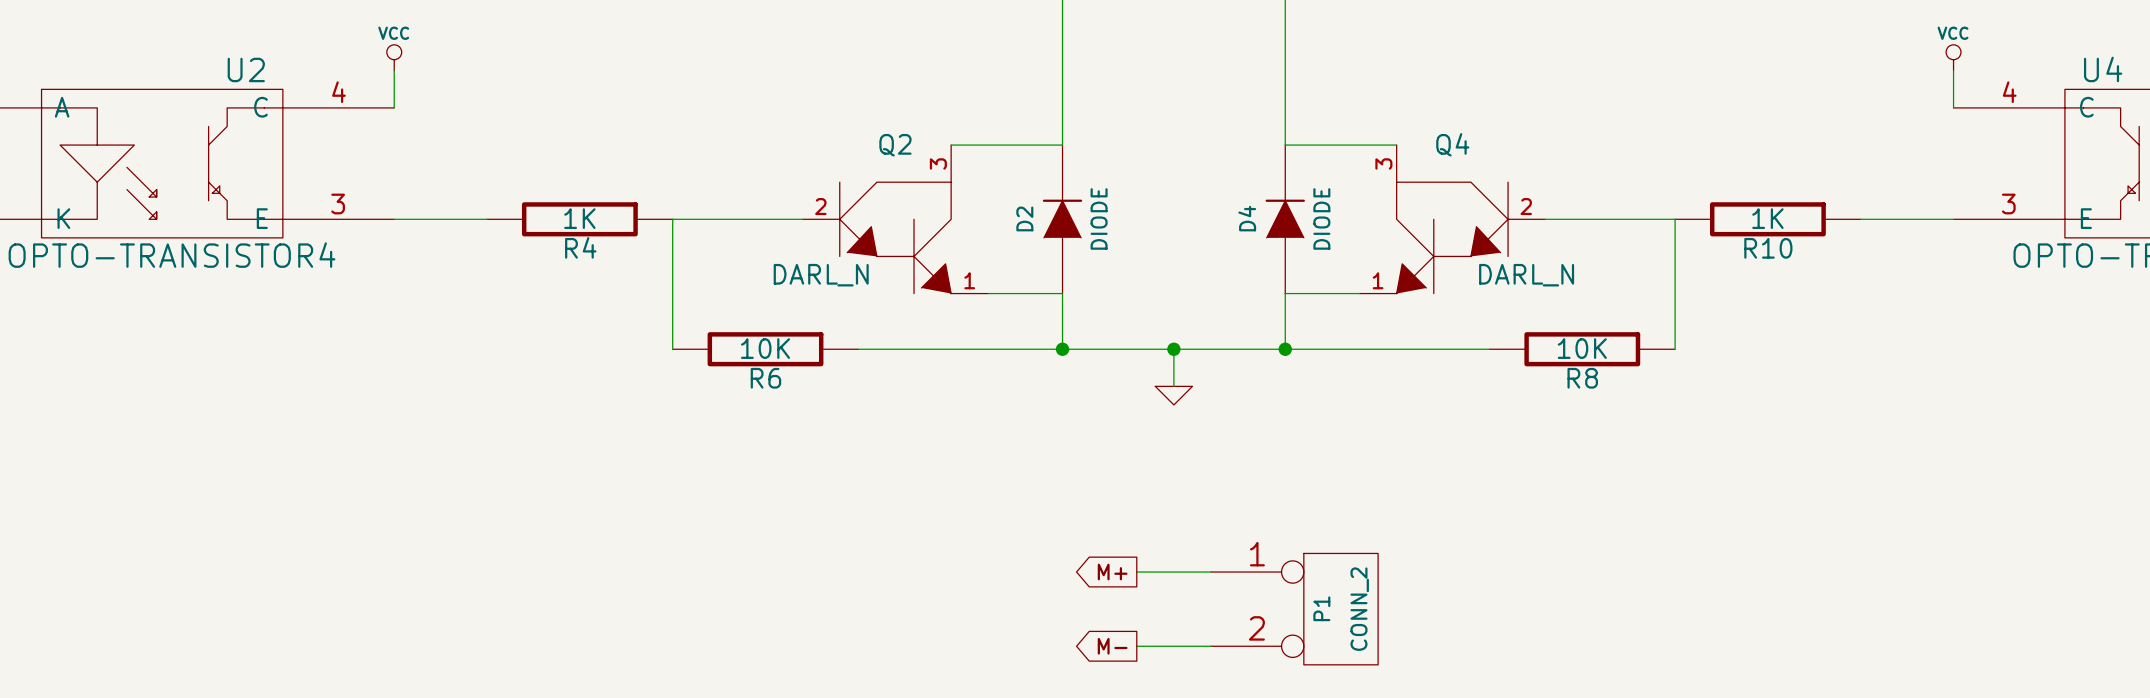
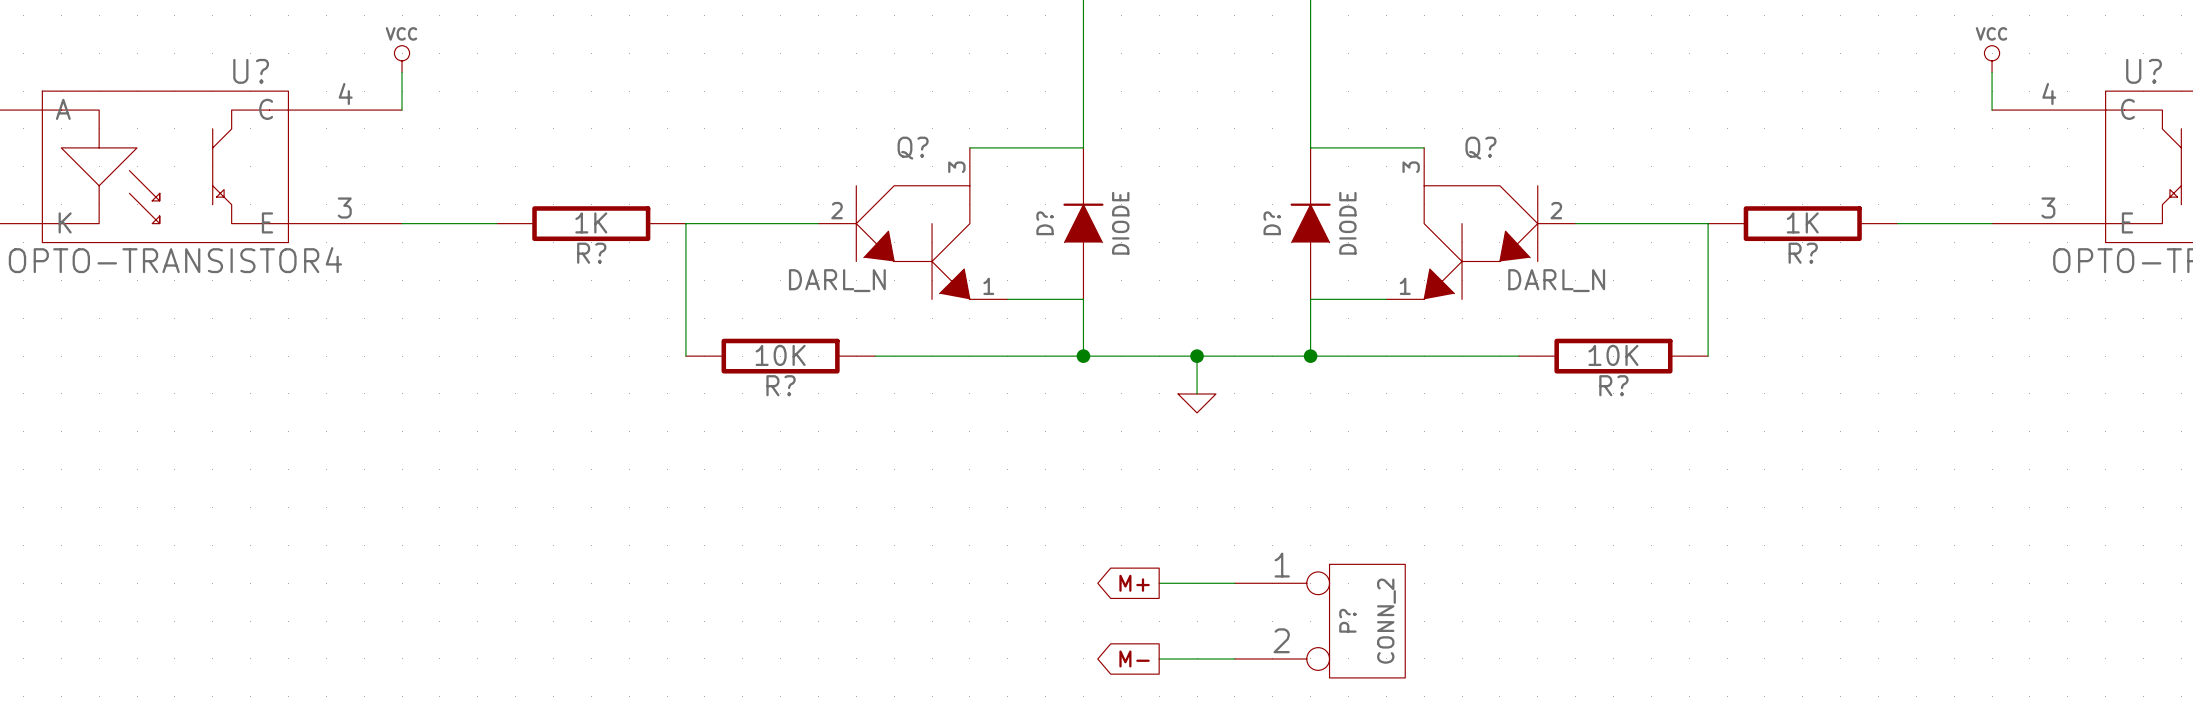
U2 name: U2 (246, 69) -> U? (251, 71)
U4 name: U4 (2103, 69) -> U? (2144, 71)
Q4 name: Q4 (1452, 144) -> Q? (1480, 148)
Q2 name: Q2 (895, 145) -> Q? (913, 148)
D2 name: D2 (1024, 218) -> D? (1045, 223)
D4 name: D4 (1247, 218) -> D? (1272, 223)
R4 name: R4 (580, 247) -> R? (591, 253)
R10 name: R10 (1768, 248) -> R? (1803, 253)
R6 name: R6 (765, 378) -> R? (781, 385)
R8 name: R8 (1582, 378) -> R? (1613, 385)
P1 name: P1 (1321, 608) -> P? (1347, 620)

